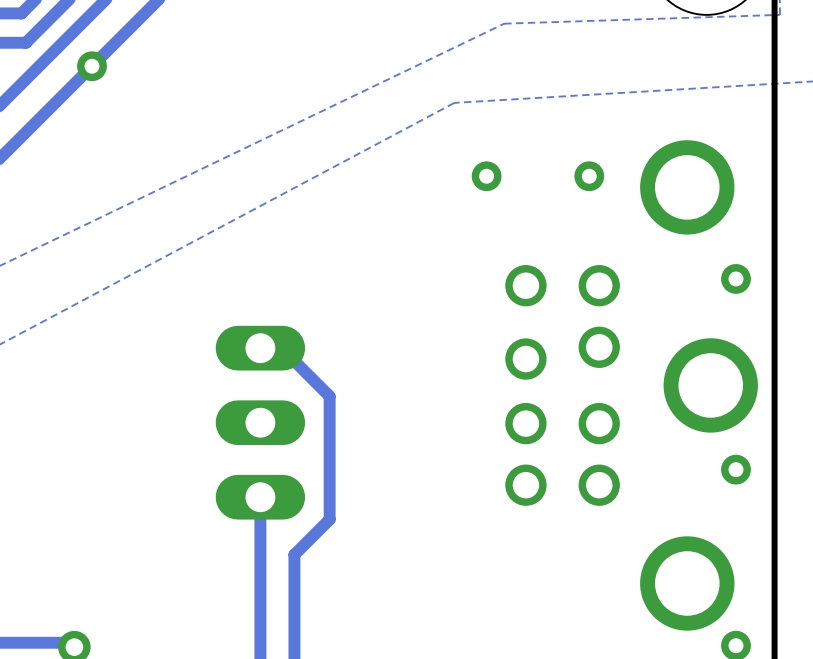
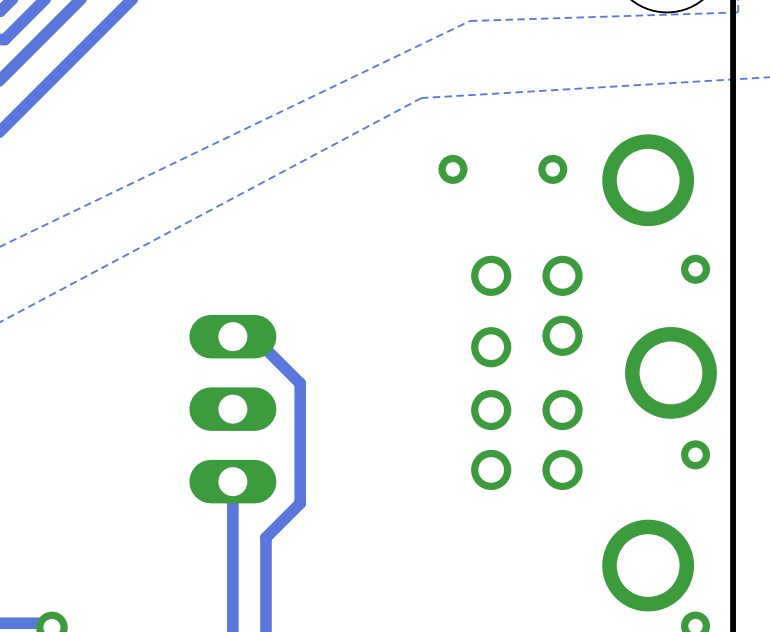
via: (91, 66) -> none

